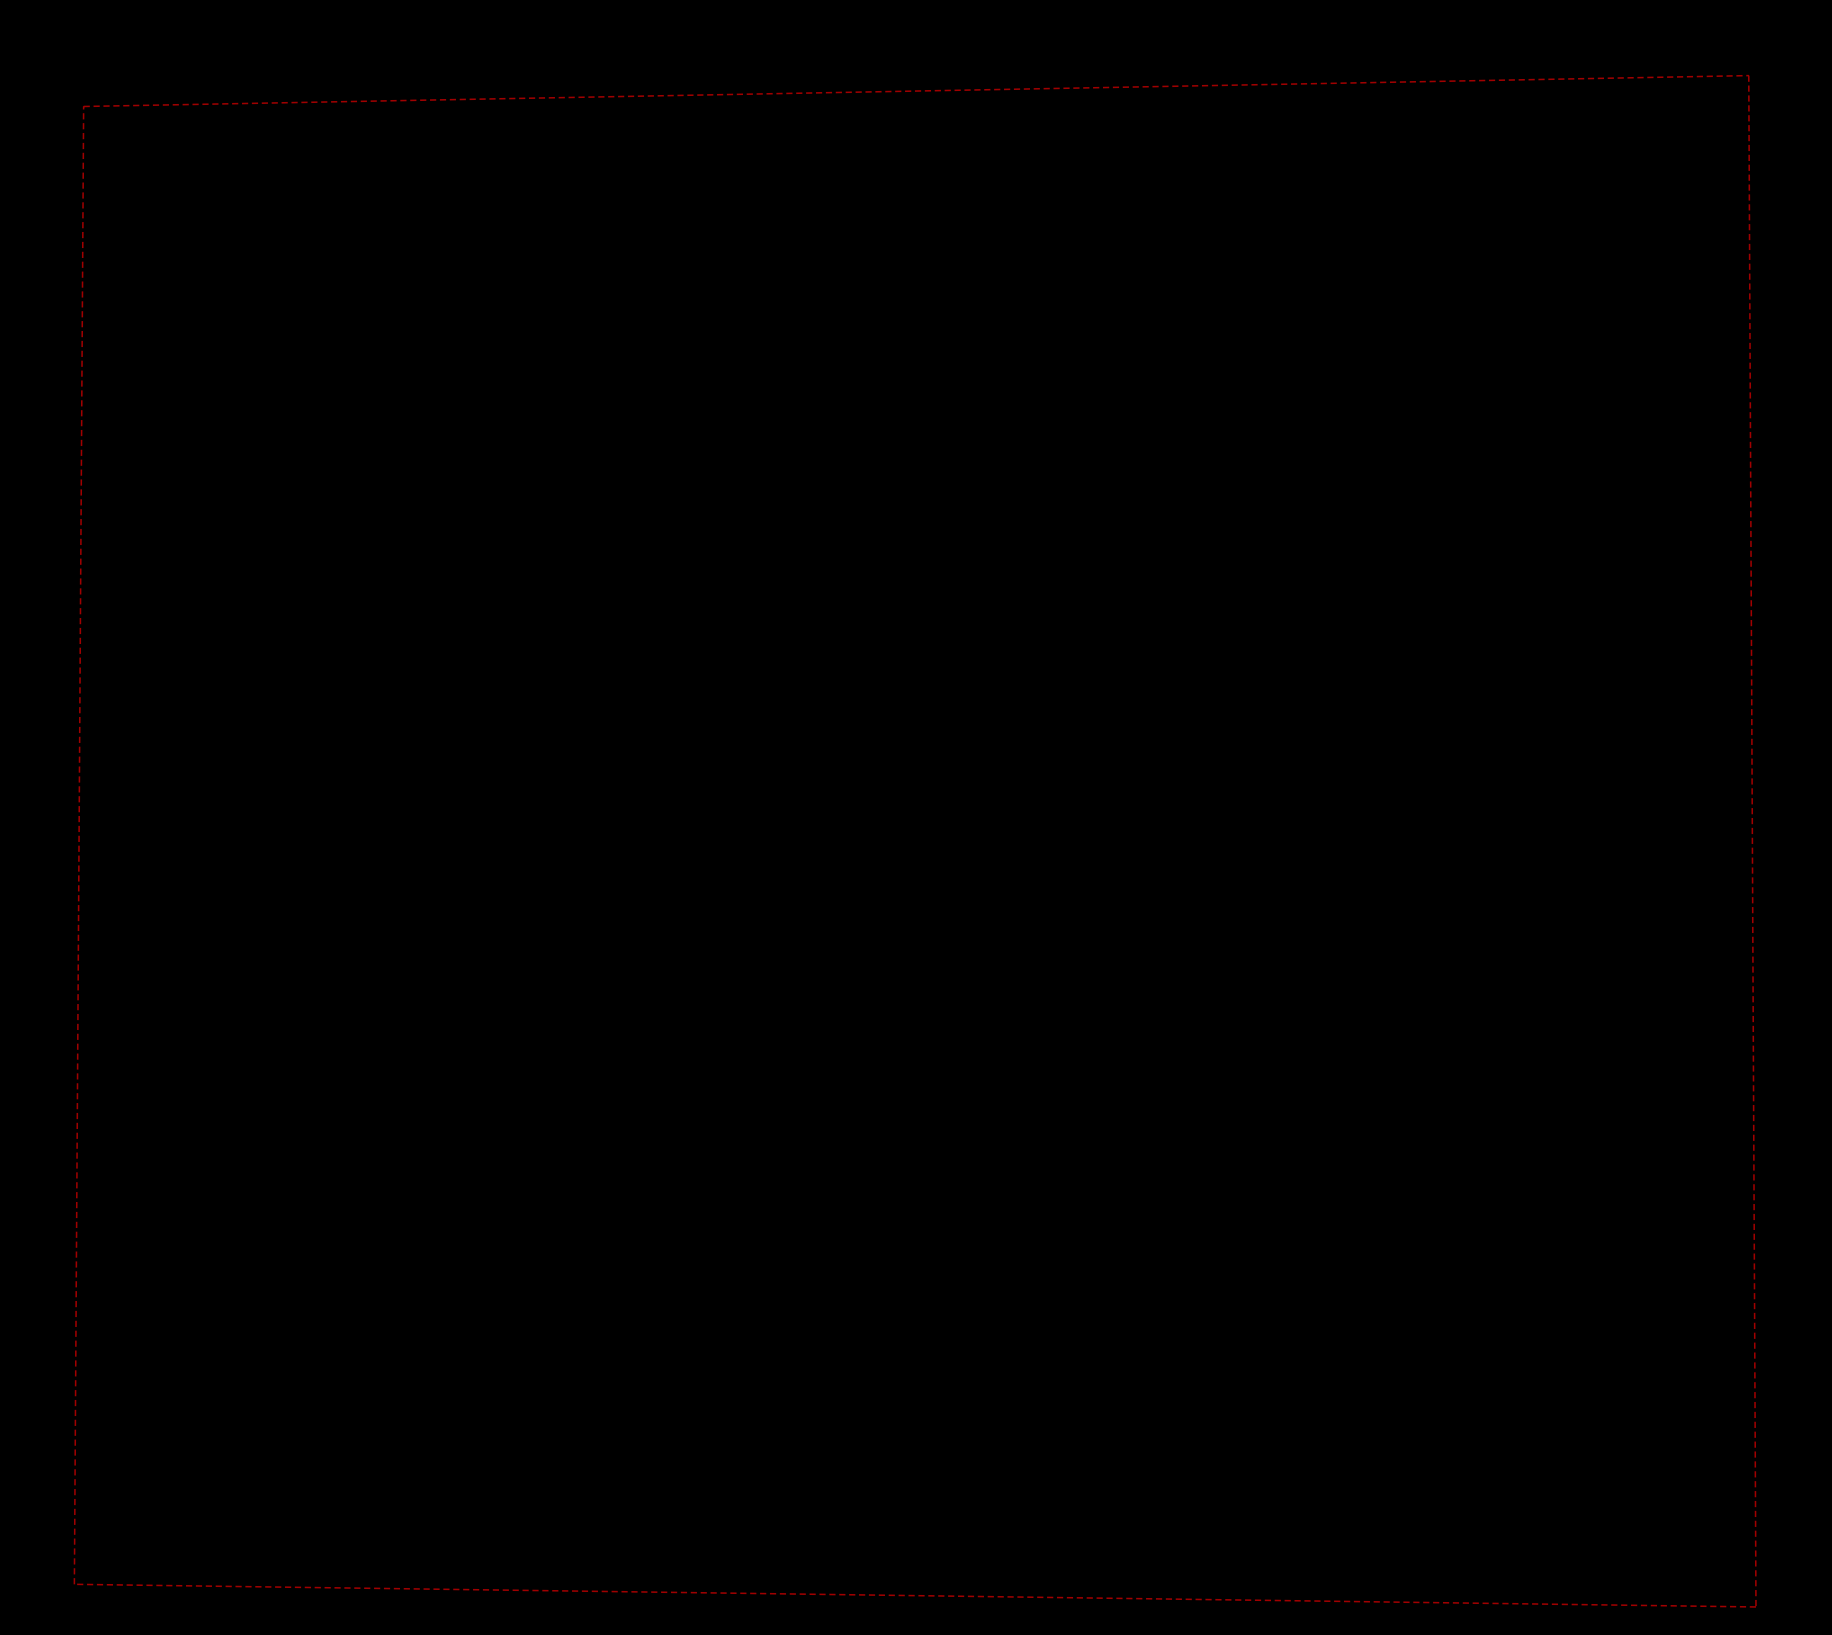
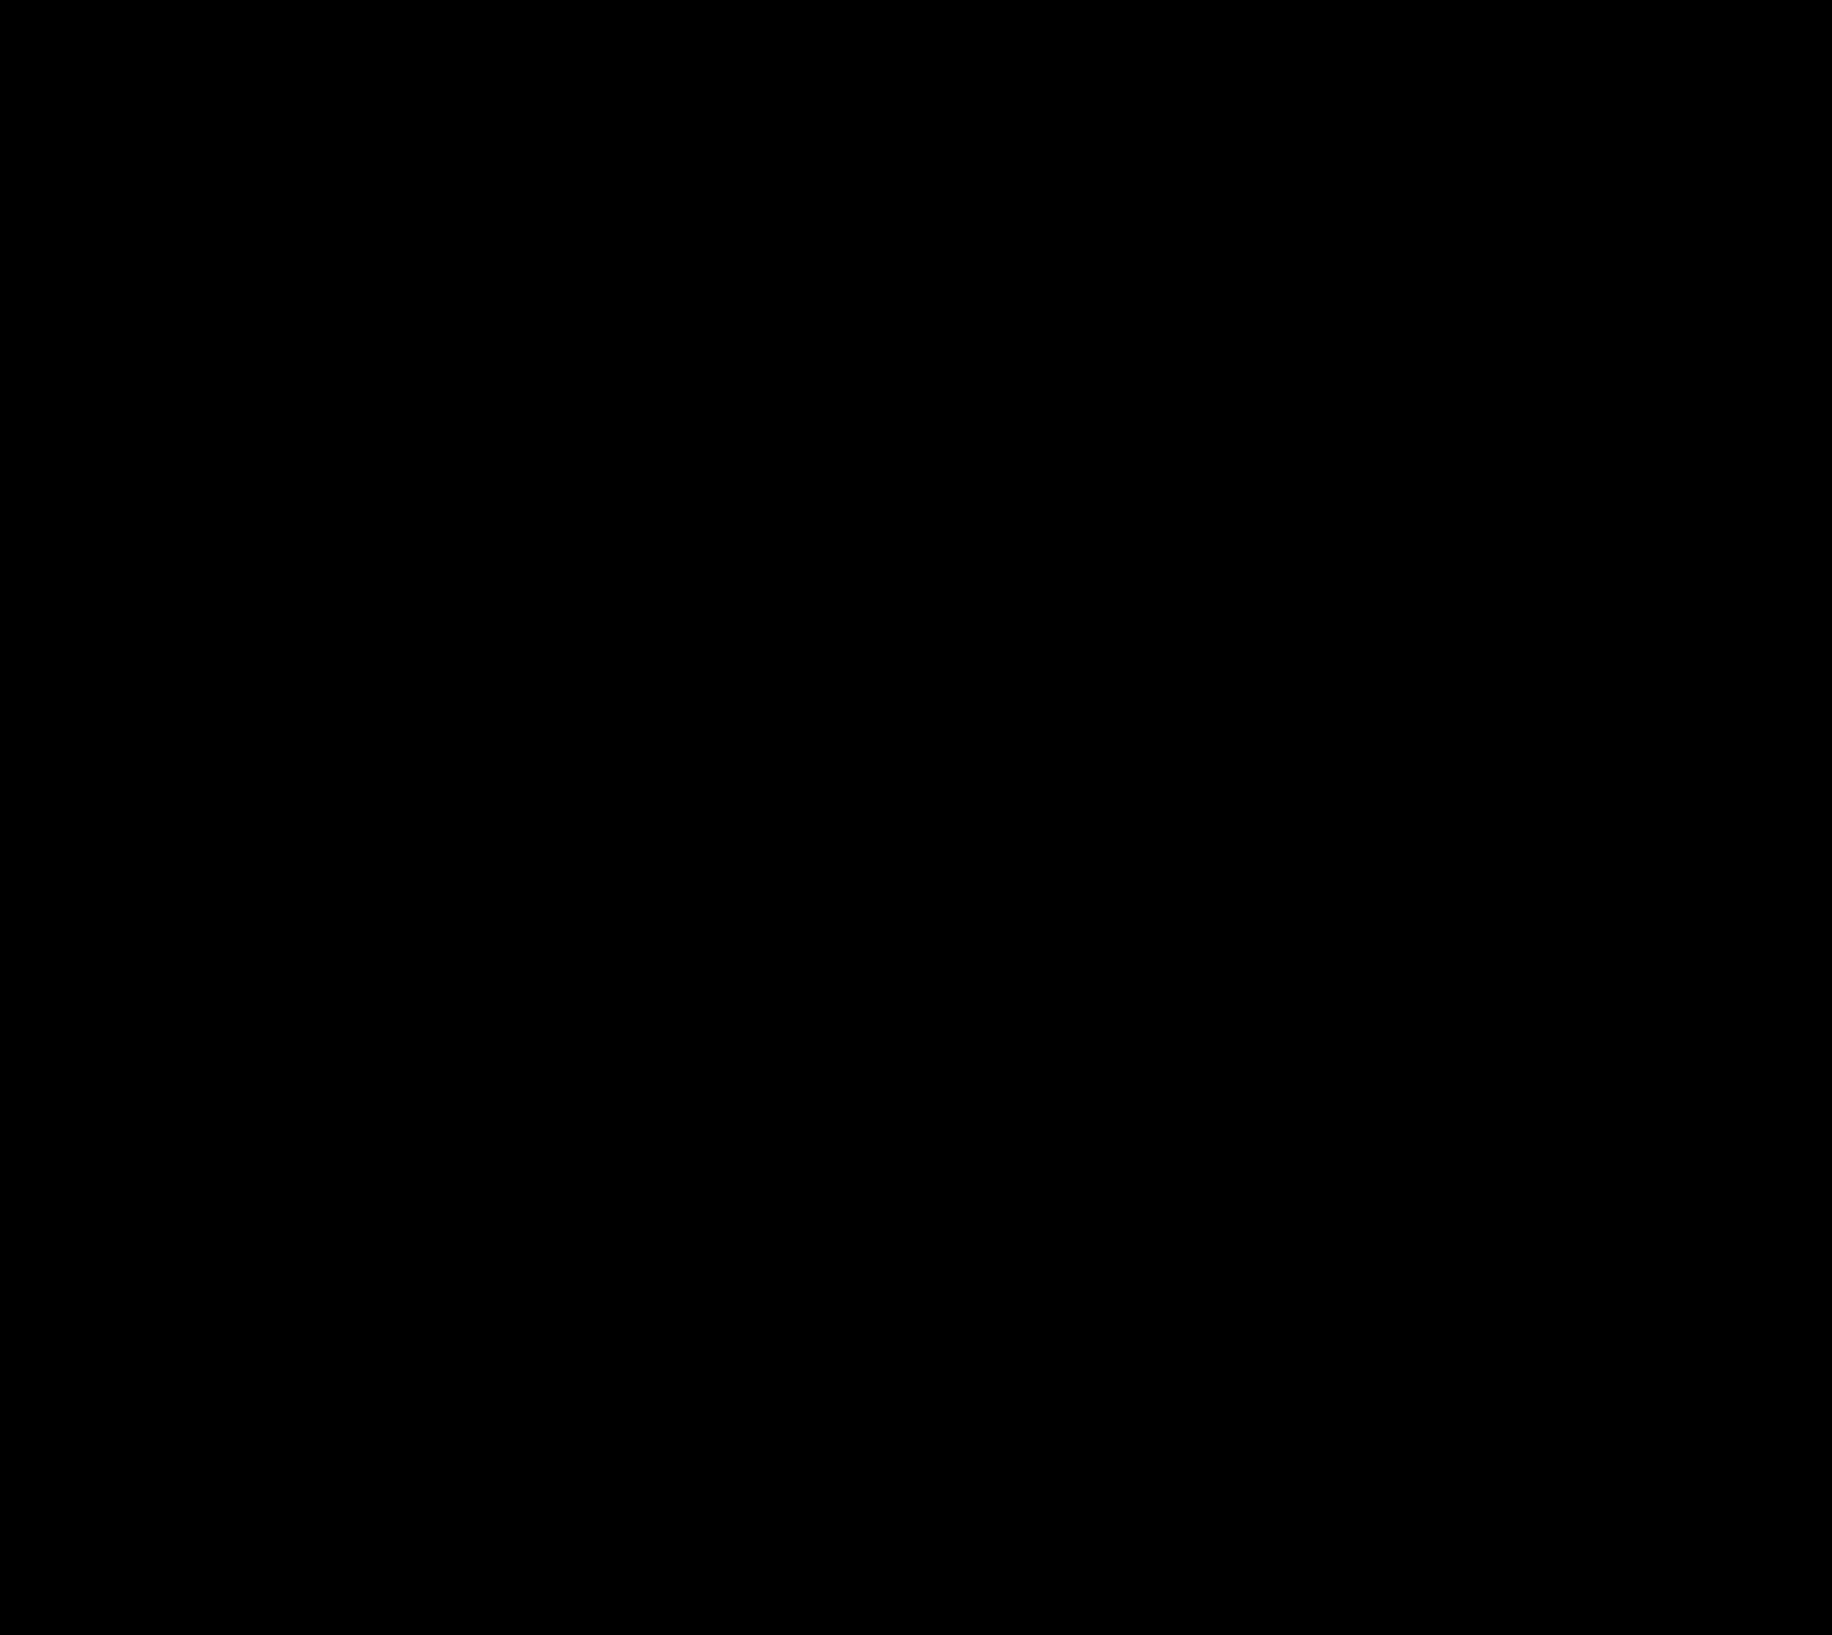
top zone outline: (1748, 75) (83, 106) (74, 1584) (1755, 1606) (1748, 75) -> none

